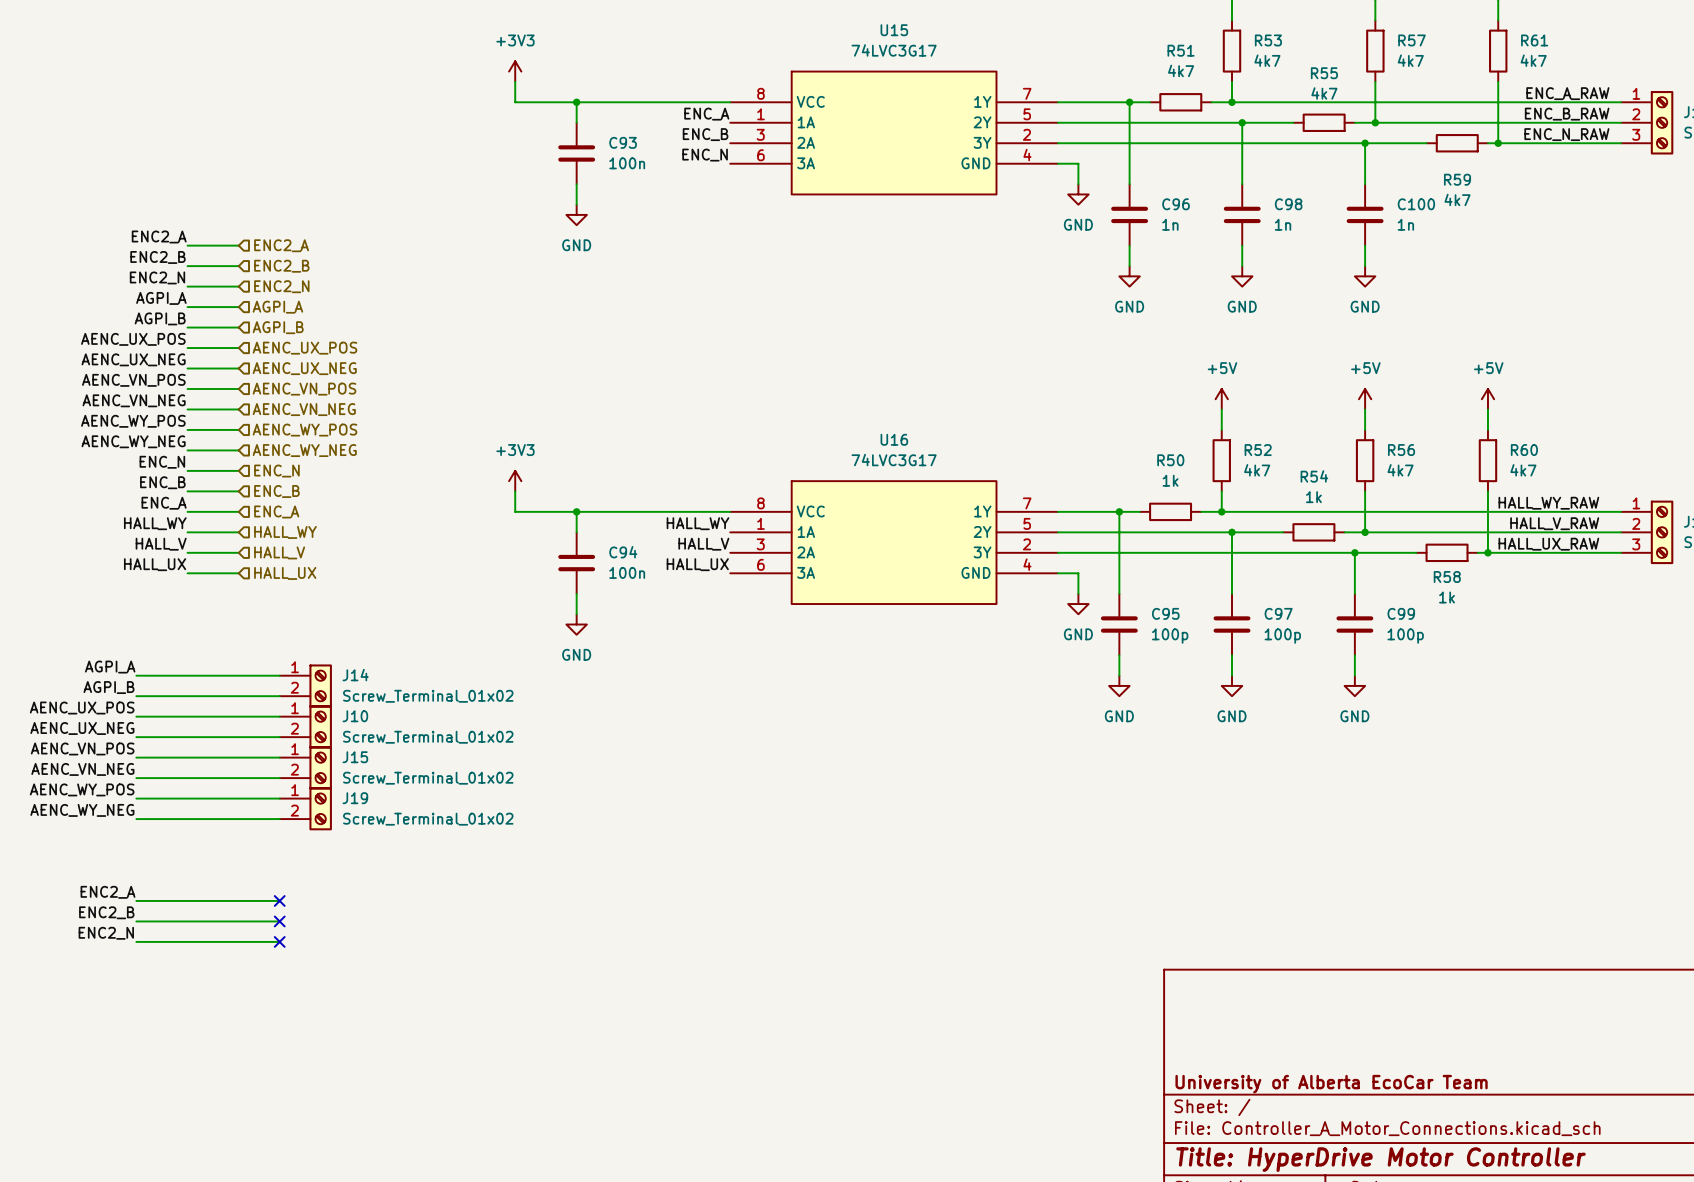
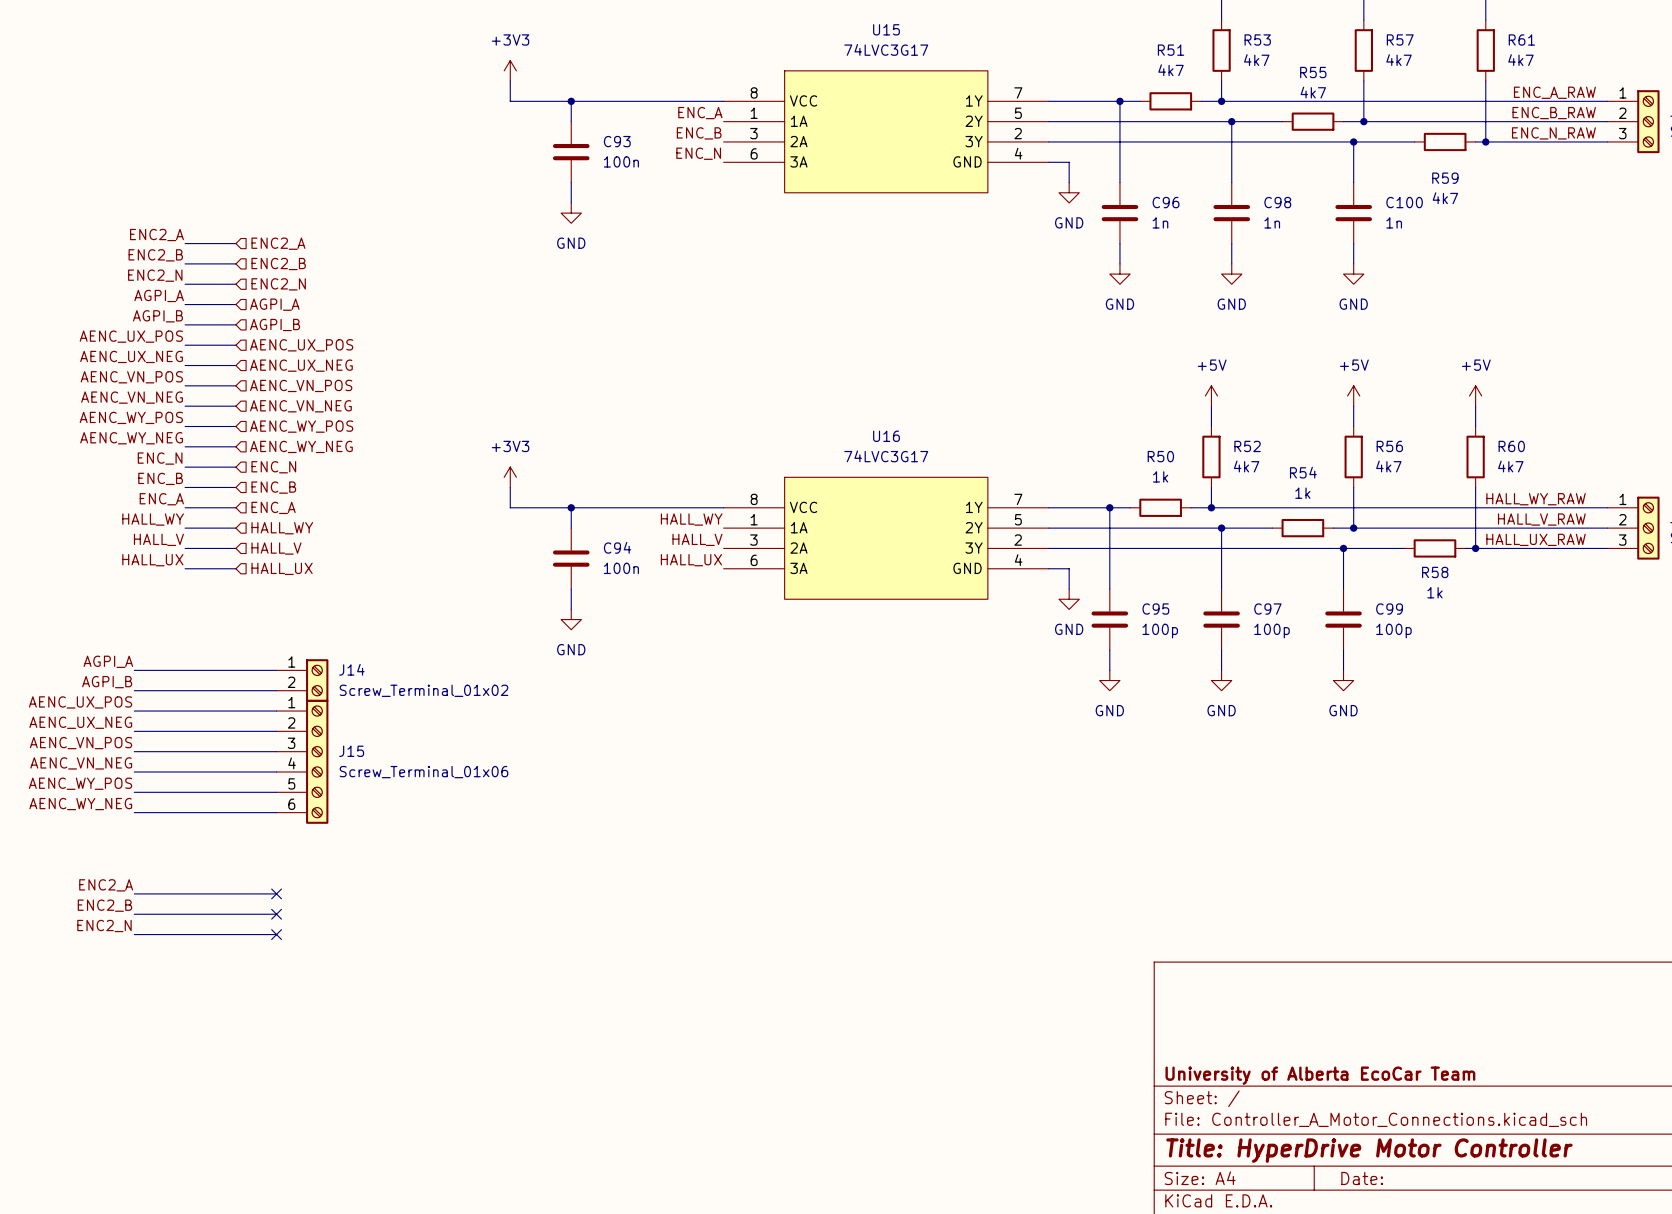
J10: Screw_Terminal_01x02 (305, 726) -> none
J15 symbol: [279, 746, 332, 790] -> [276, 699, 329, 824]
J15 value: Screw_Terminal_01x02 (428, 778) -> Screw_Terminal_01x06 (423, 772)
J19: Screw_Terminal_01x02 (305, 808) -> none

